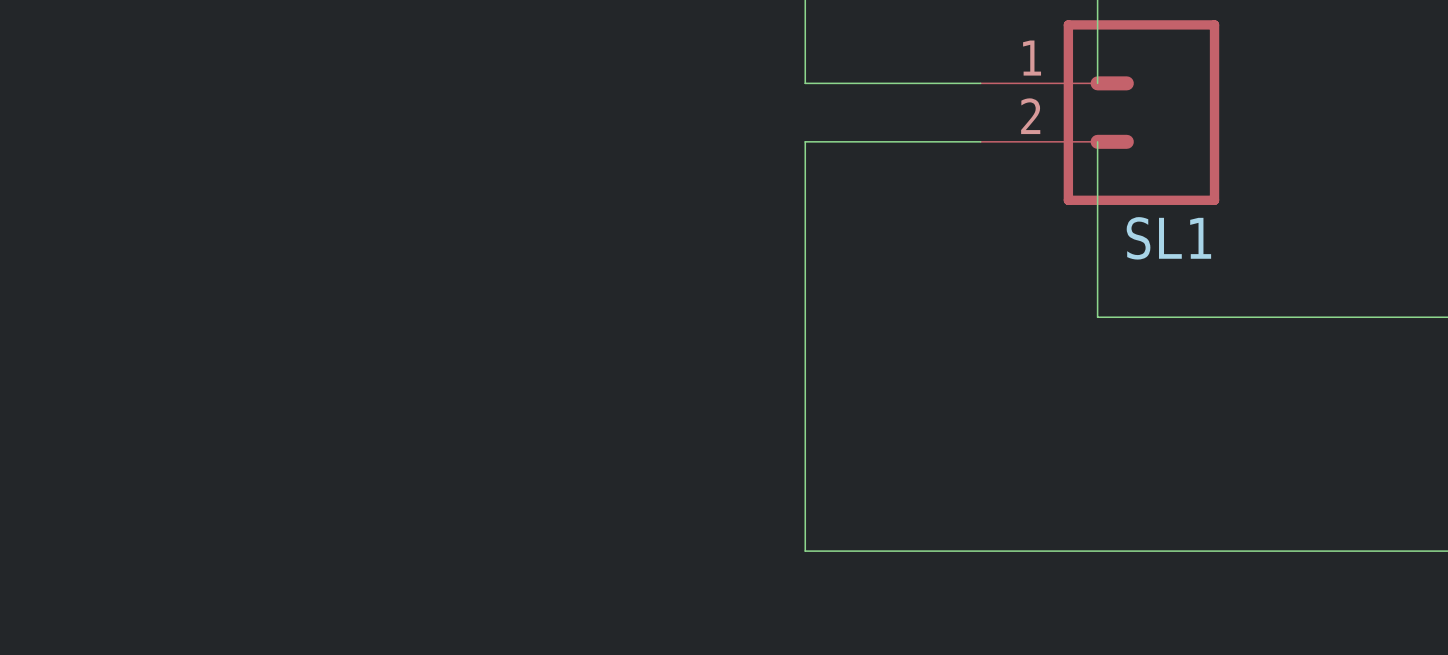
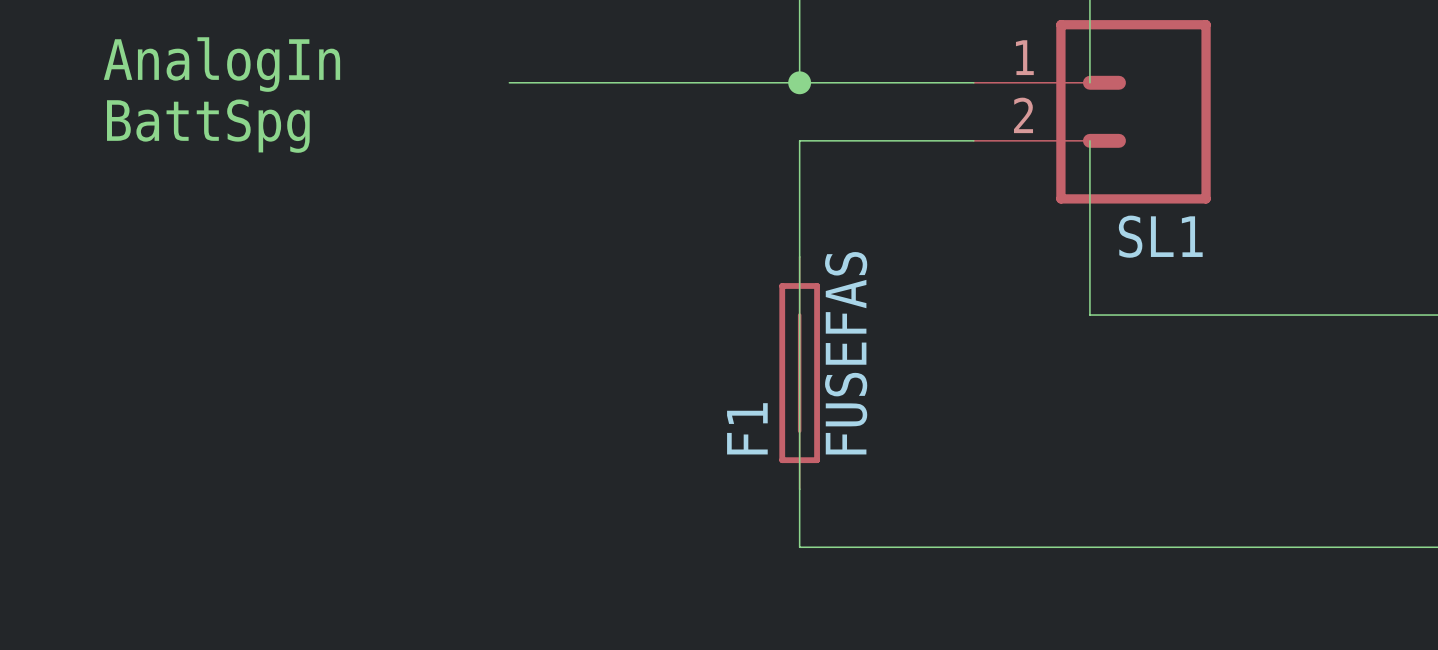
text: none -> AnalogIn (221, 64)
wire: none -> (509, 82) (799, 82)
junction: none -> (799, 82)
text: none -> BattSpg (208, 126)
F1: none -> FUSEFAS (799, 373)

